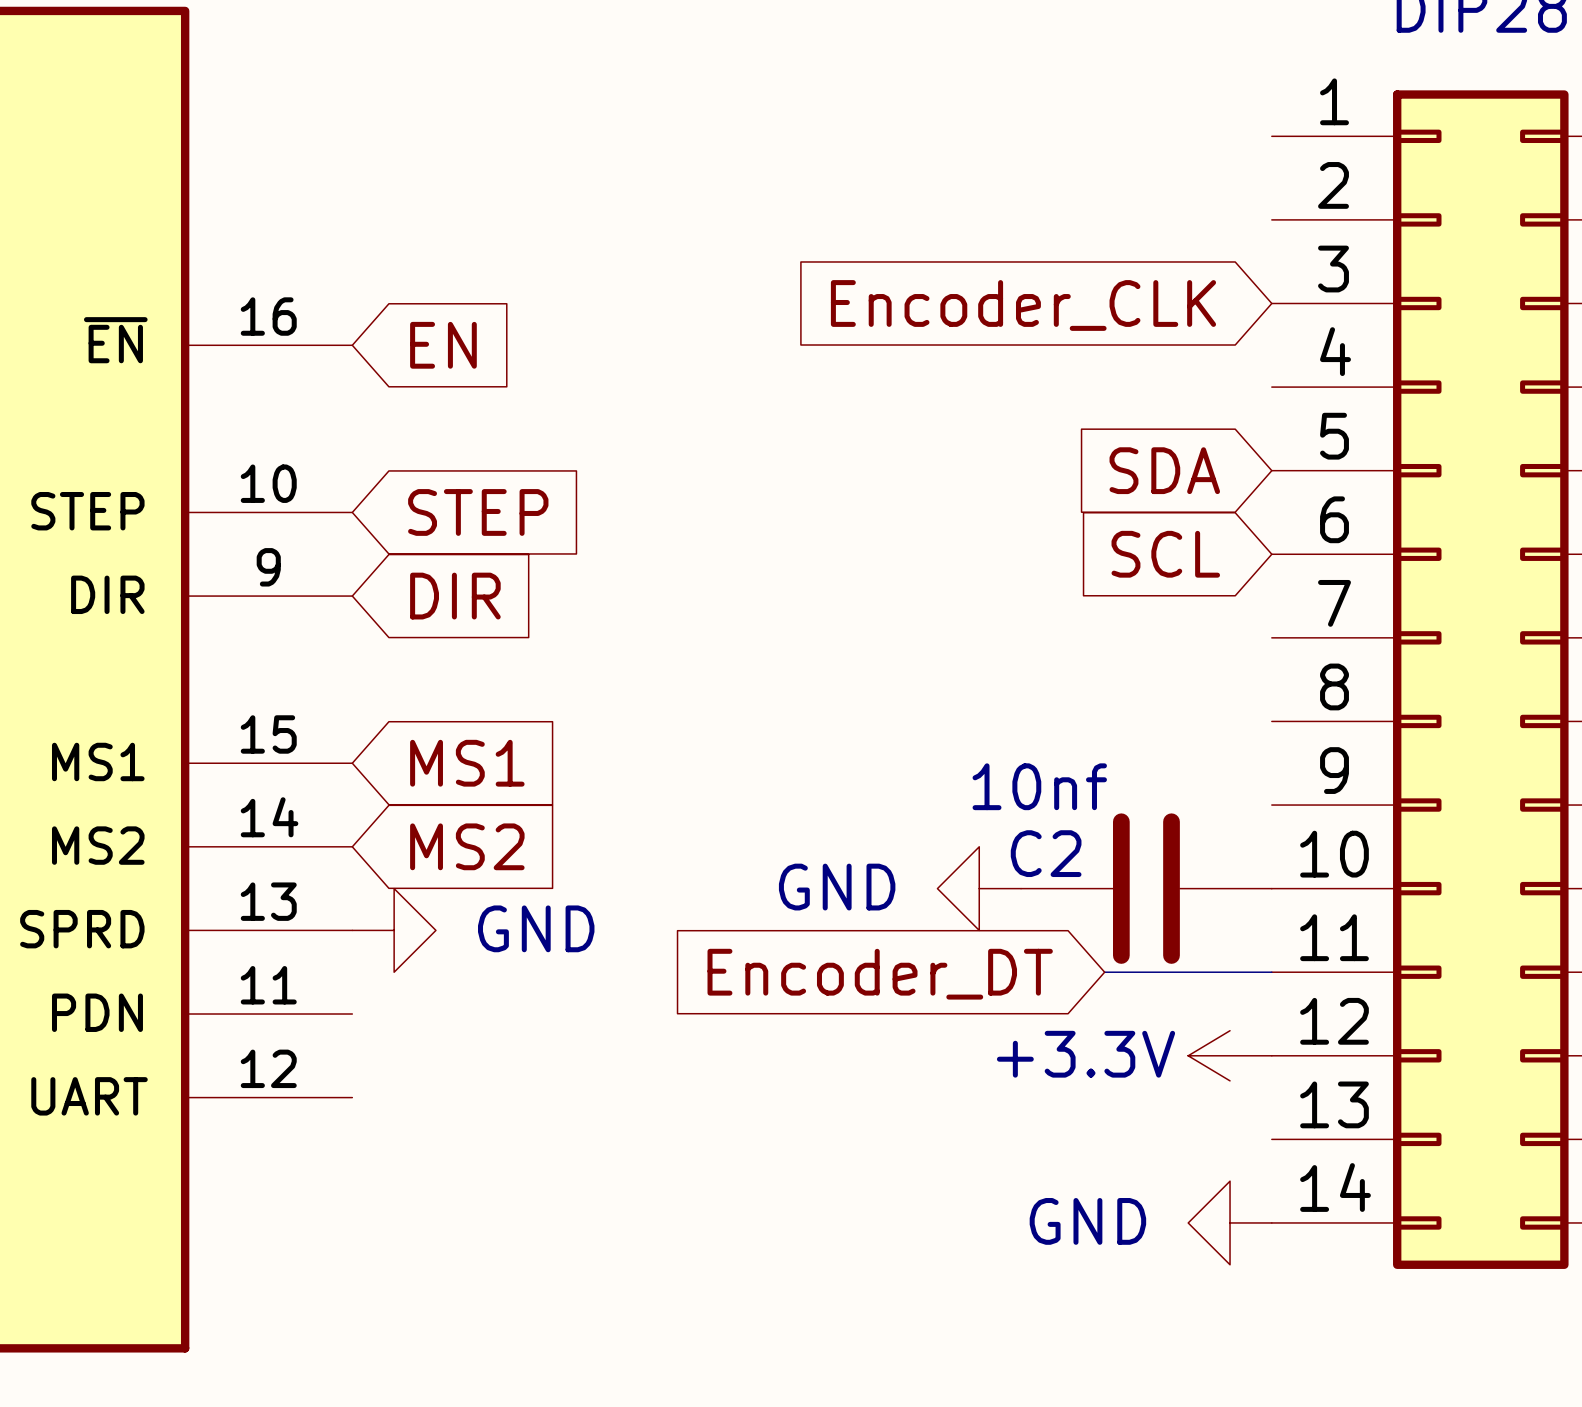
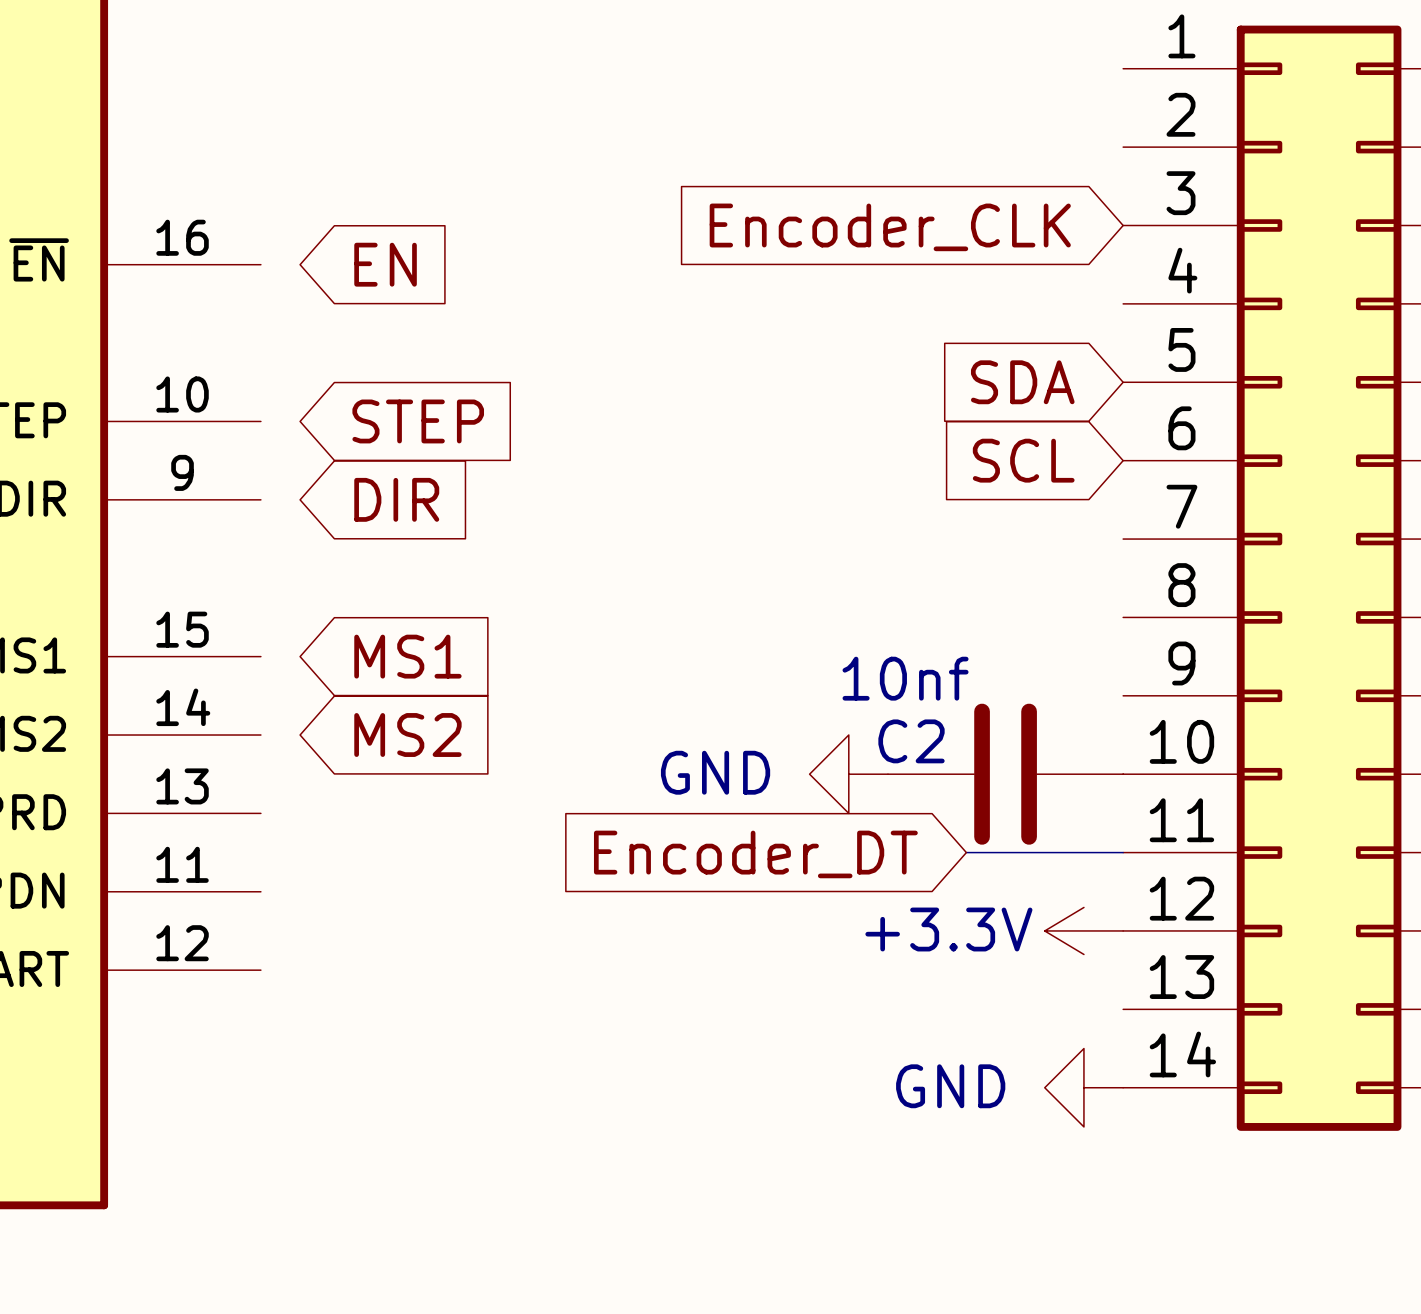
global label position: EN (443, 345) -> EN (385, 264)
global label position: STEP (478, 512) -> STEP (418, 421)
global label position: DIR (455, 596) -> DIR (396, 499)
global label position: MS1 (467, 763) -> MS1 (407, 656)
global label position: MS2 (467, 846) -> MS2 (407, 735)
power symbol: GND (394, 930) -> none

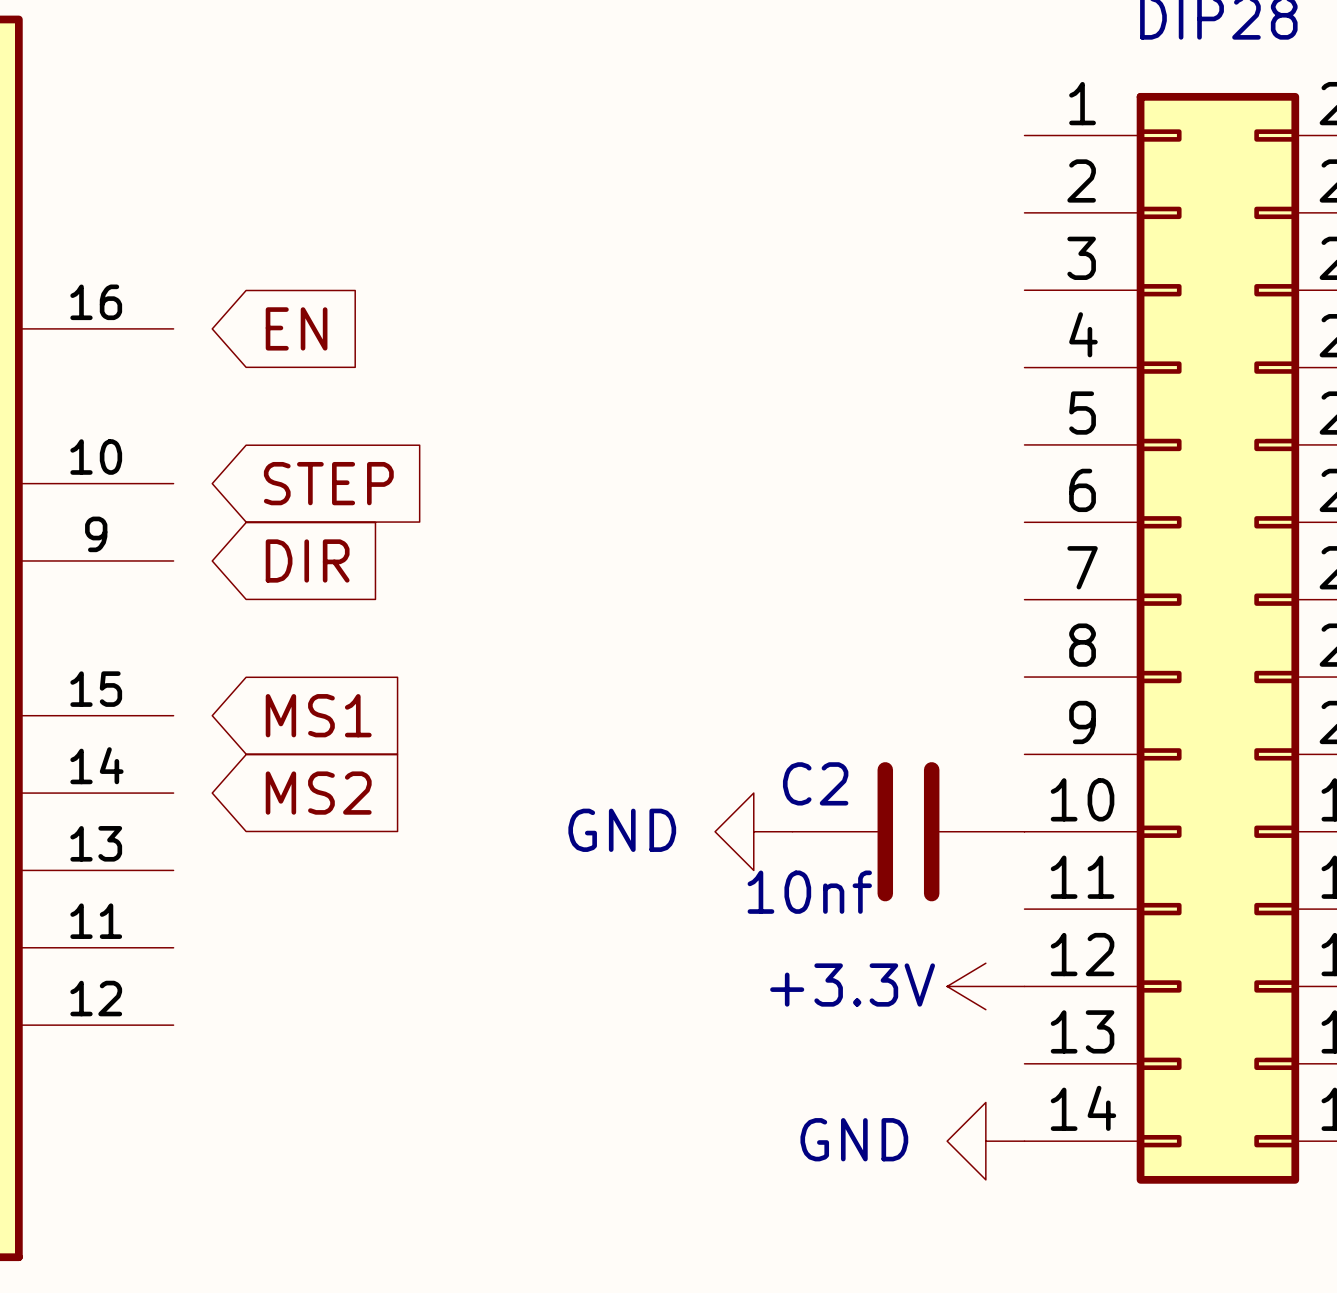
global label: Encoder_CLK (890, 227) -> none
global label: SDA (1022, 382) -> none
global label: SCL (1023, 460) -> none
C2 value position: 10nf (905, 678) -> 10nf (809, 892)
C2 name position: C2 (911, 741) -> C2 (815, 783)
wire: (966, 852) (1123, 852) -> none
global label: Encoder_DT (755, 854) -> none

